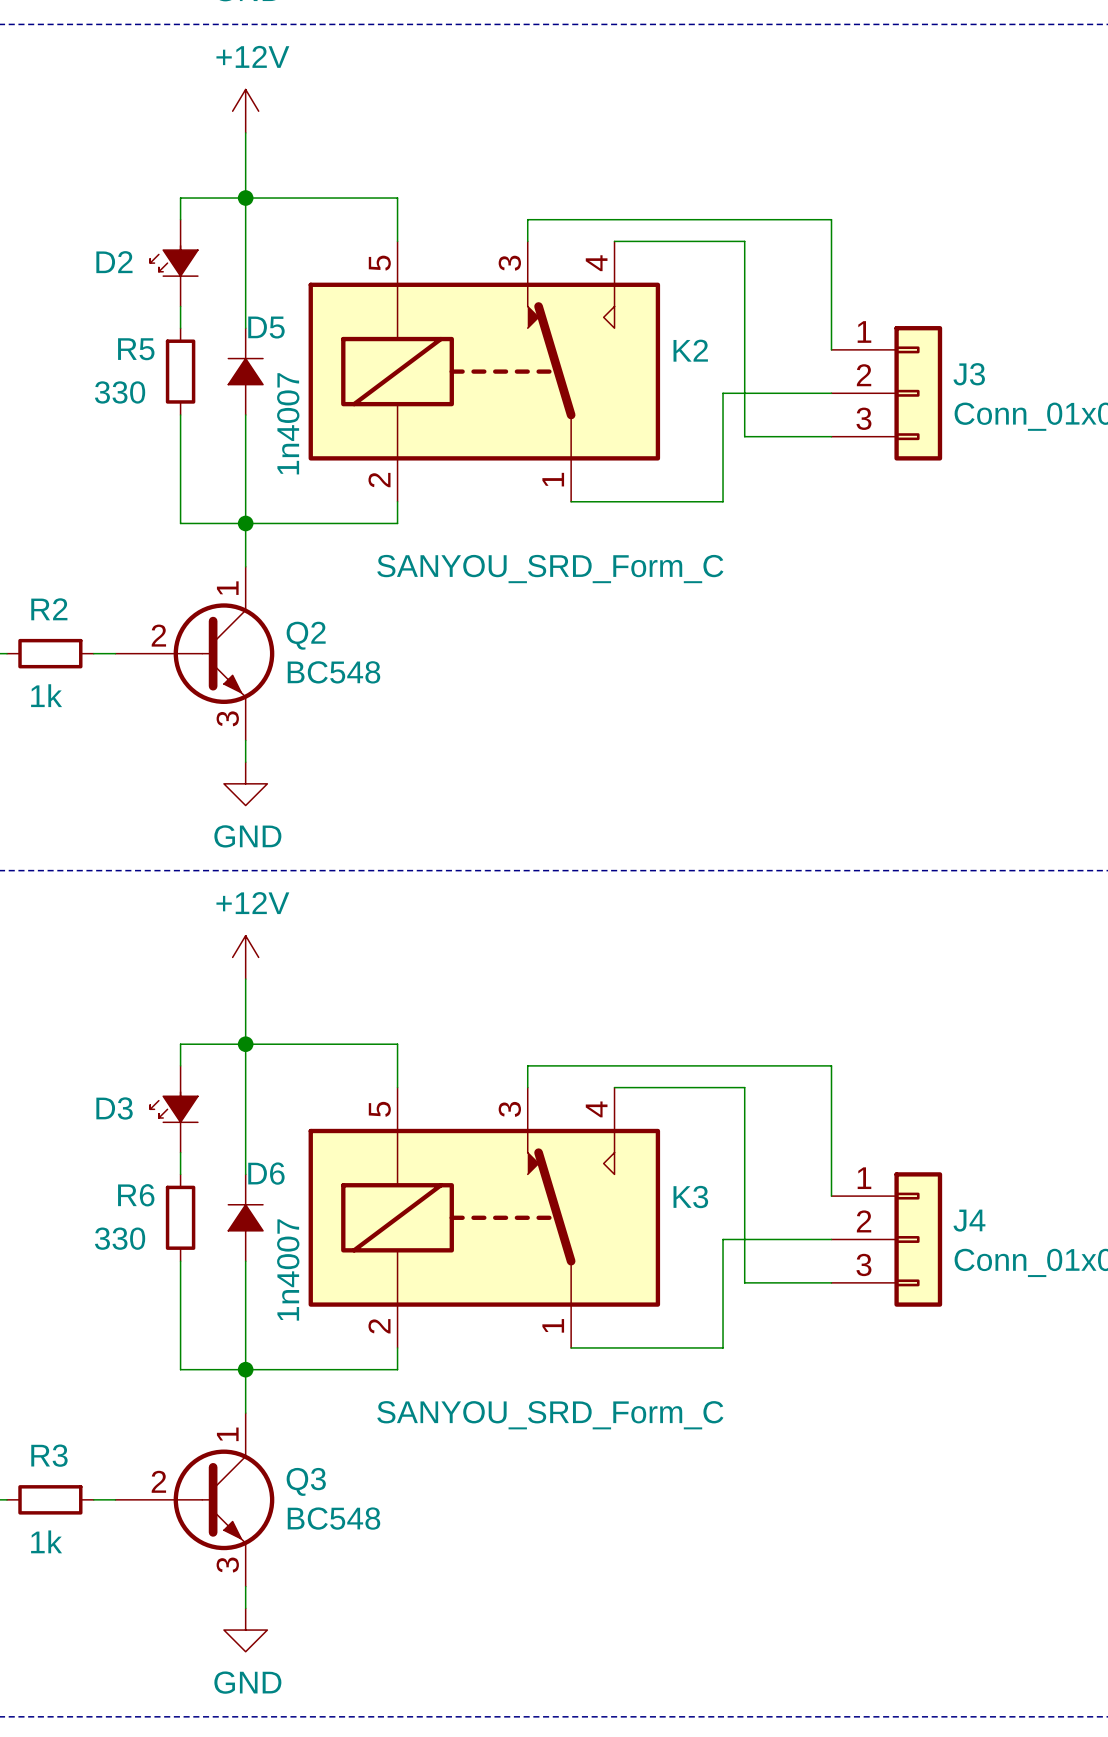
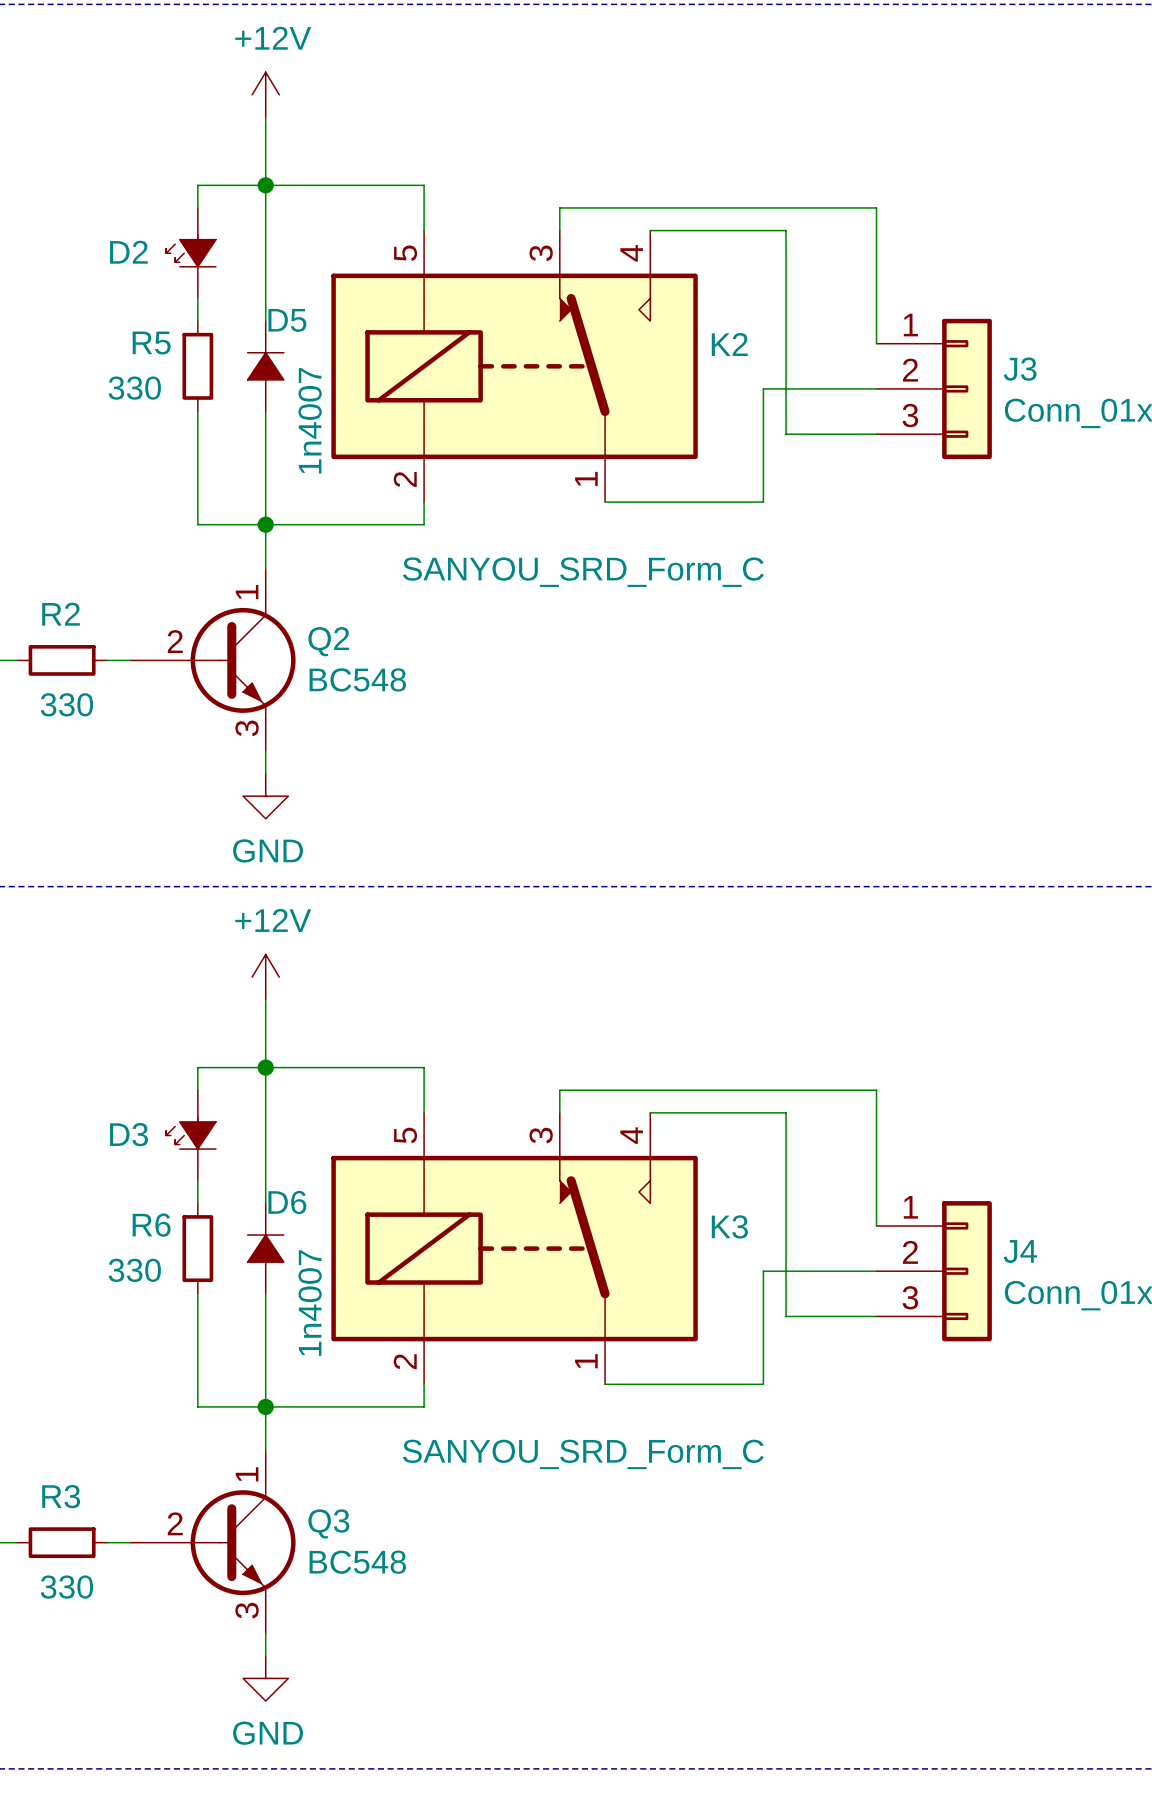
R2 value: 1k (46, 695) -> 330 (66, 704)
R3 value: 1k (46, 1541) -> 330 (66, 1587)

